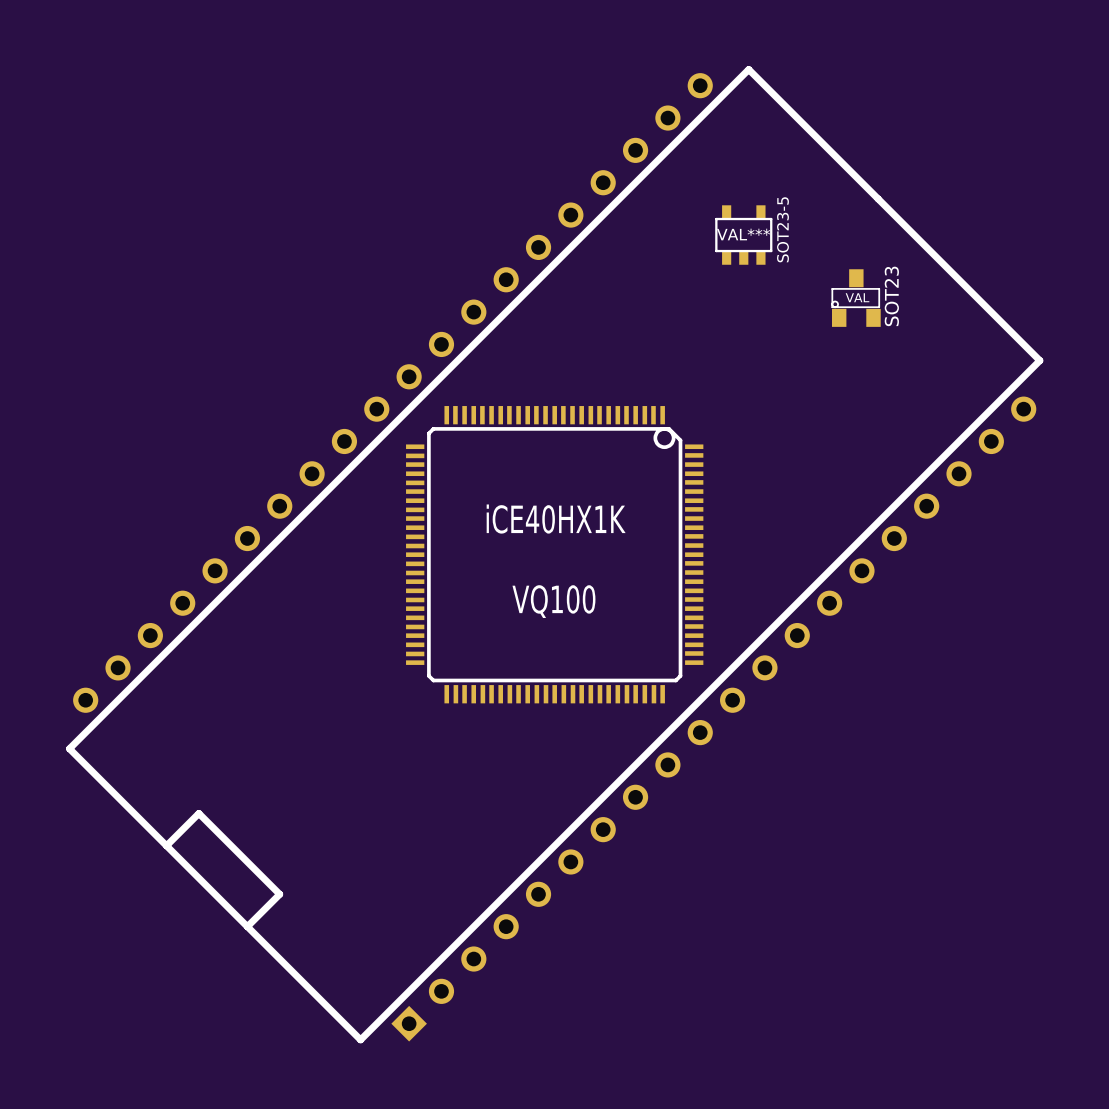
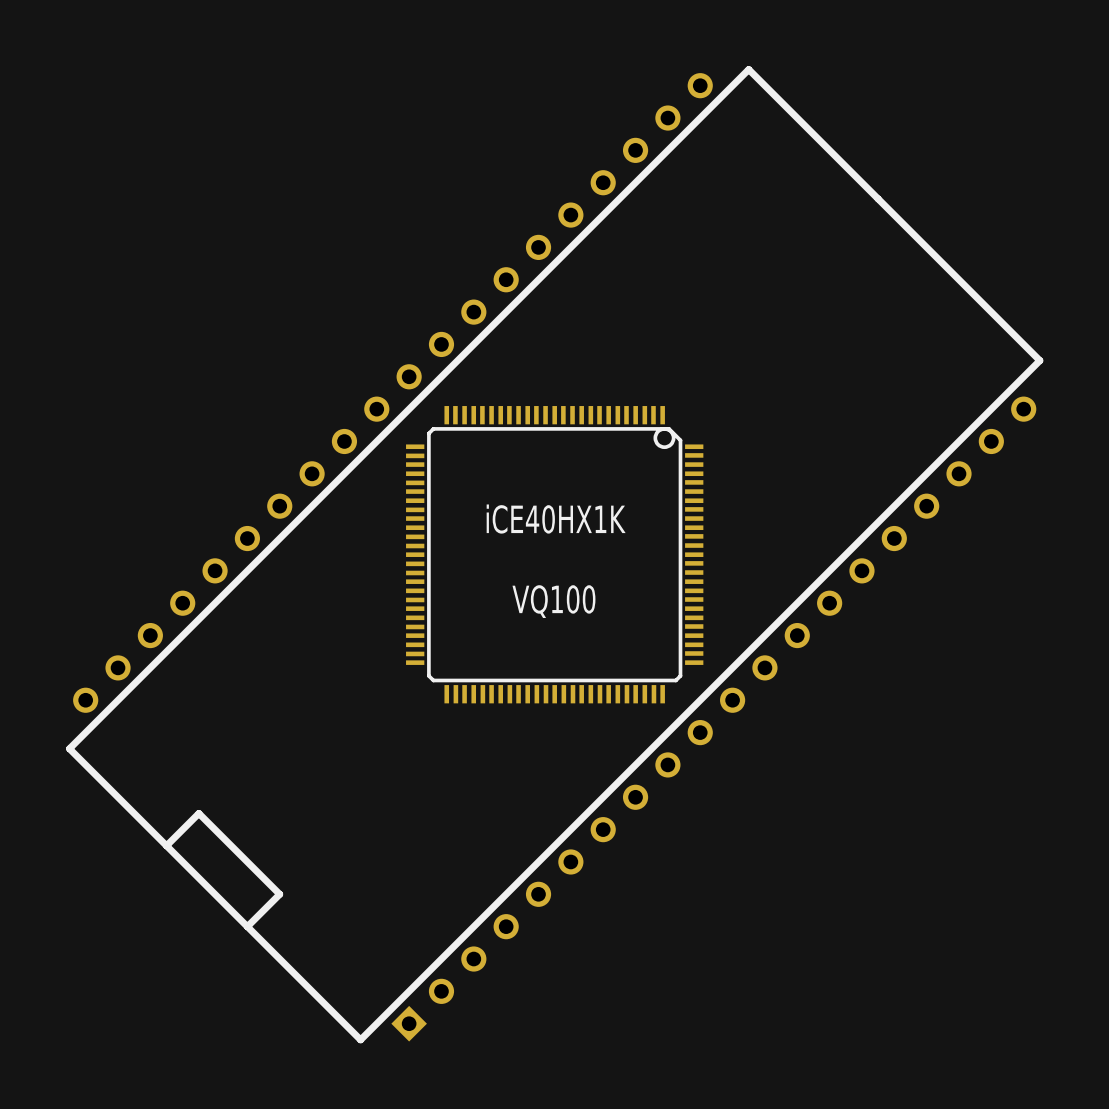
SOT23-5: VAL*** (743, 235) -> none
SOT23: VAL (856, 298) -> none

